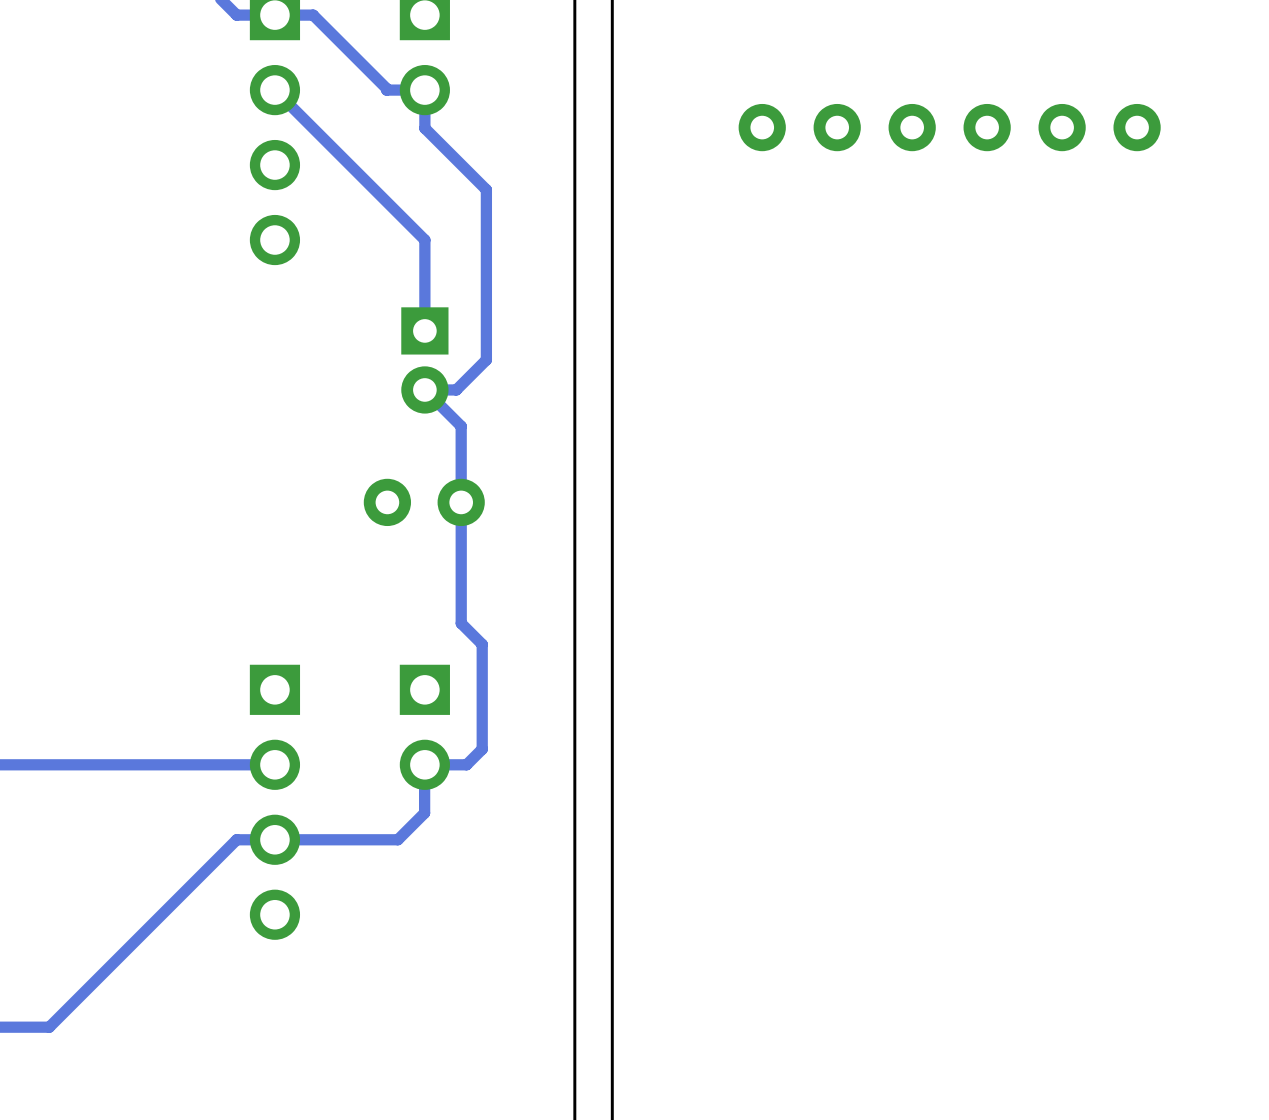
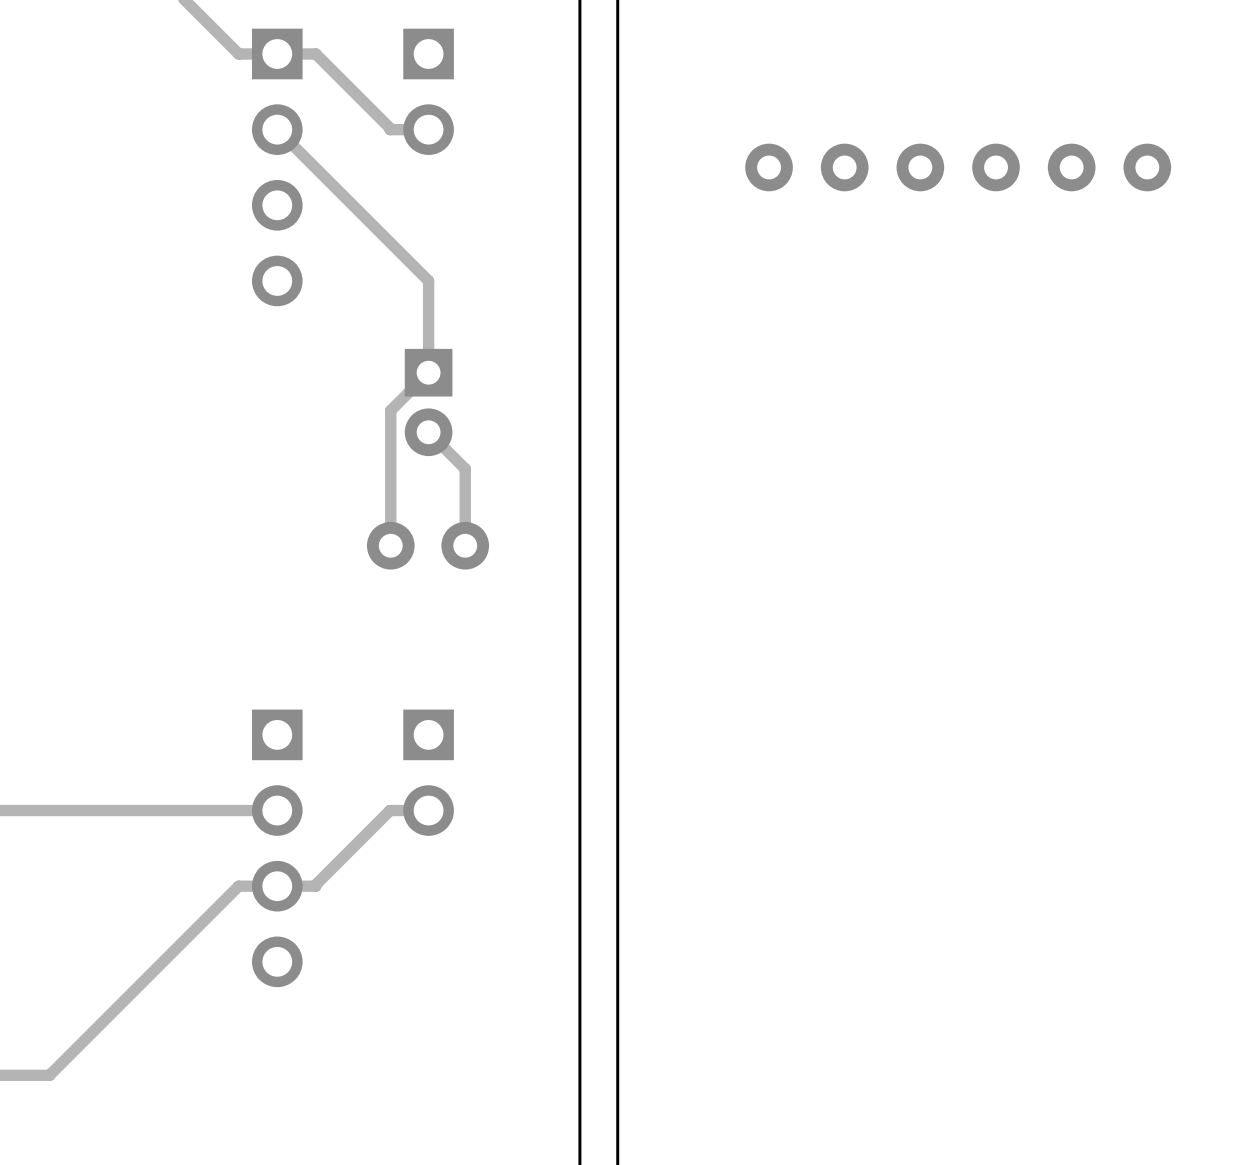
track: (424, 90) (424, 128) (486, 189) (486, 359) (456, 389) (424, 389) -> none
track: none -> (428, 372) (390, 410) (390, 545)
track: (461, 502) (461, 623) (482, 644) (482, 749) (466, 764) (424, 764) -> none
track: (424, 765) (424, 813) (397, 839) (313, 839) -> (428, 810) (390, 810) (315, 886)

